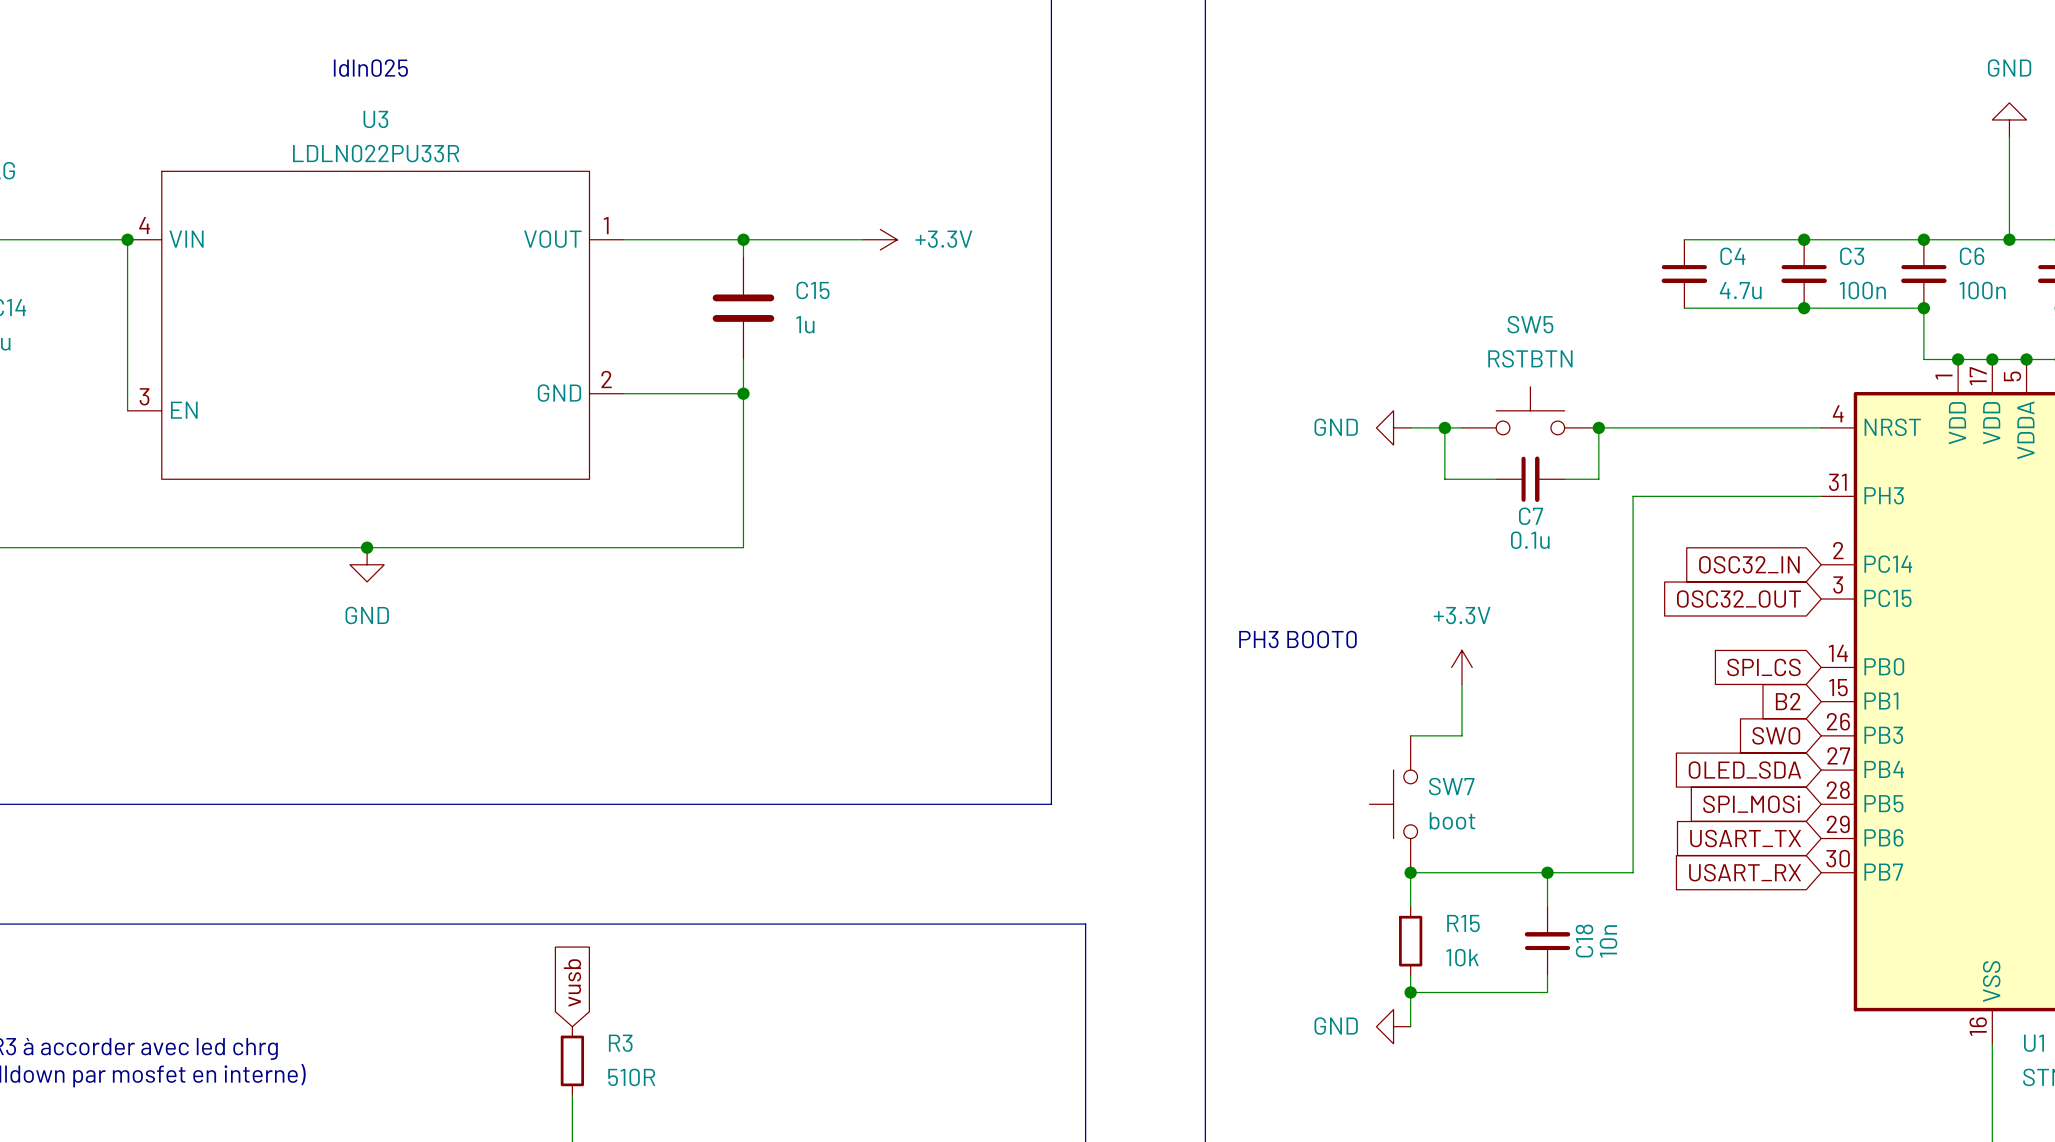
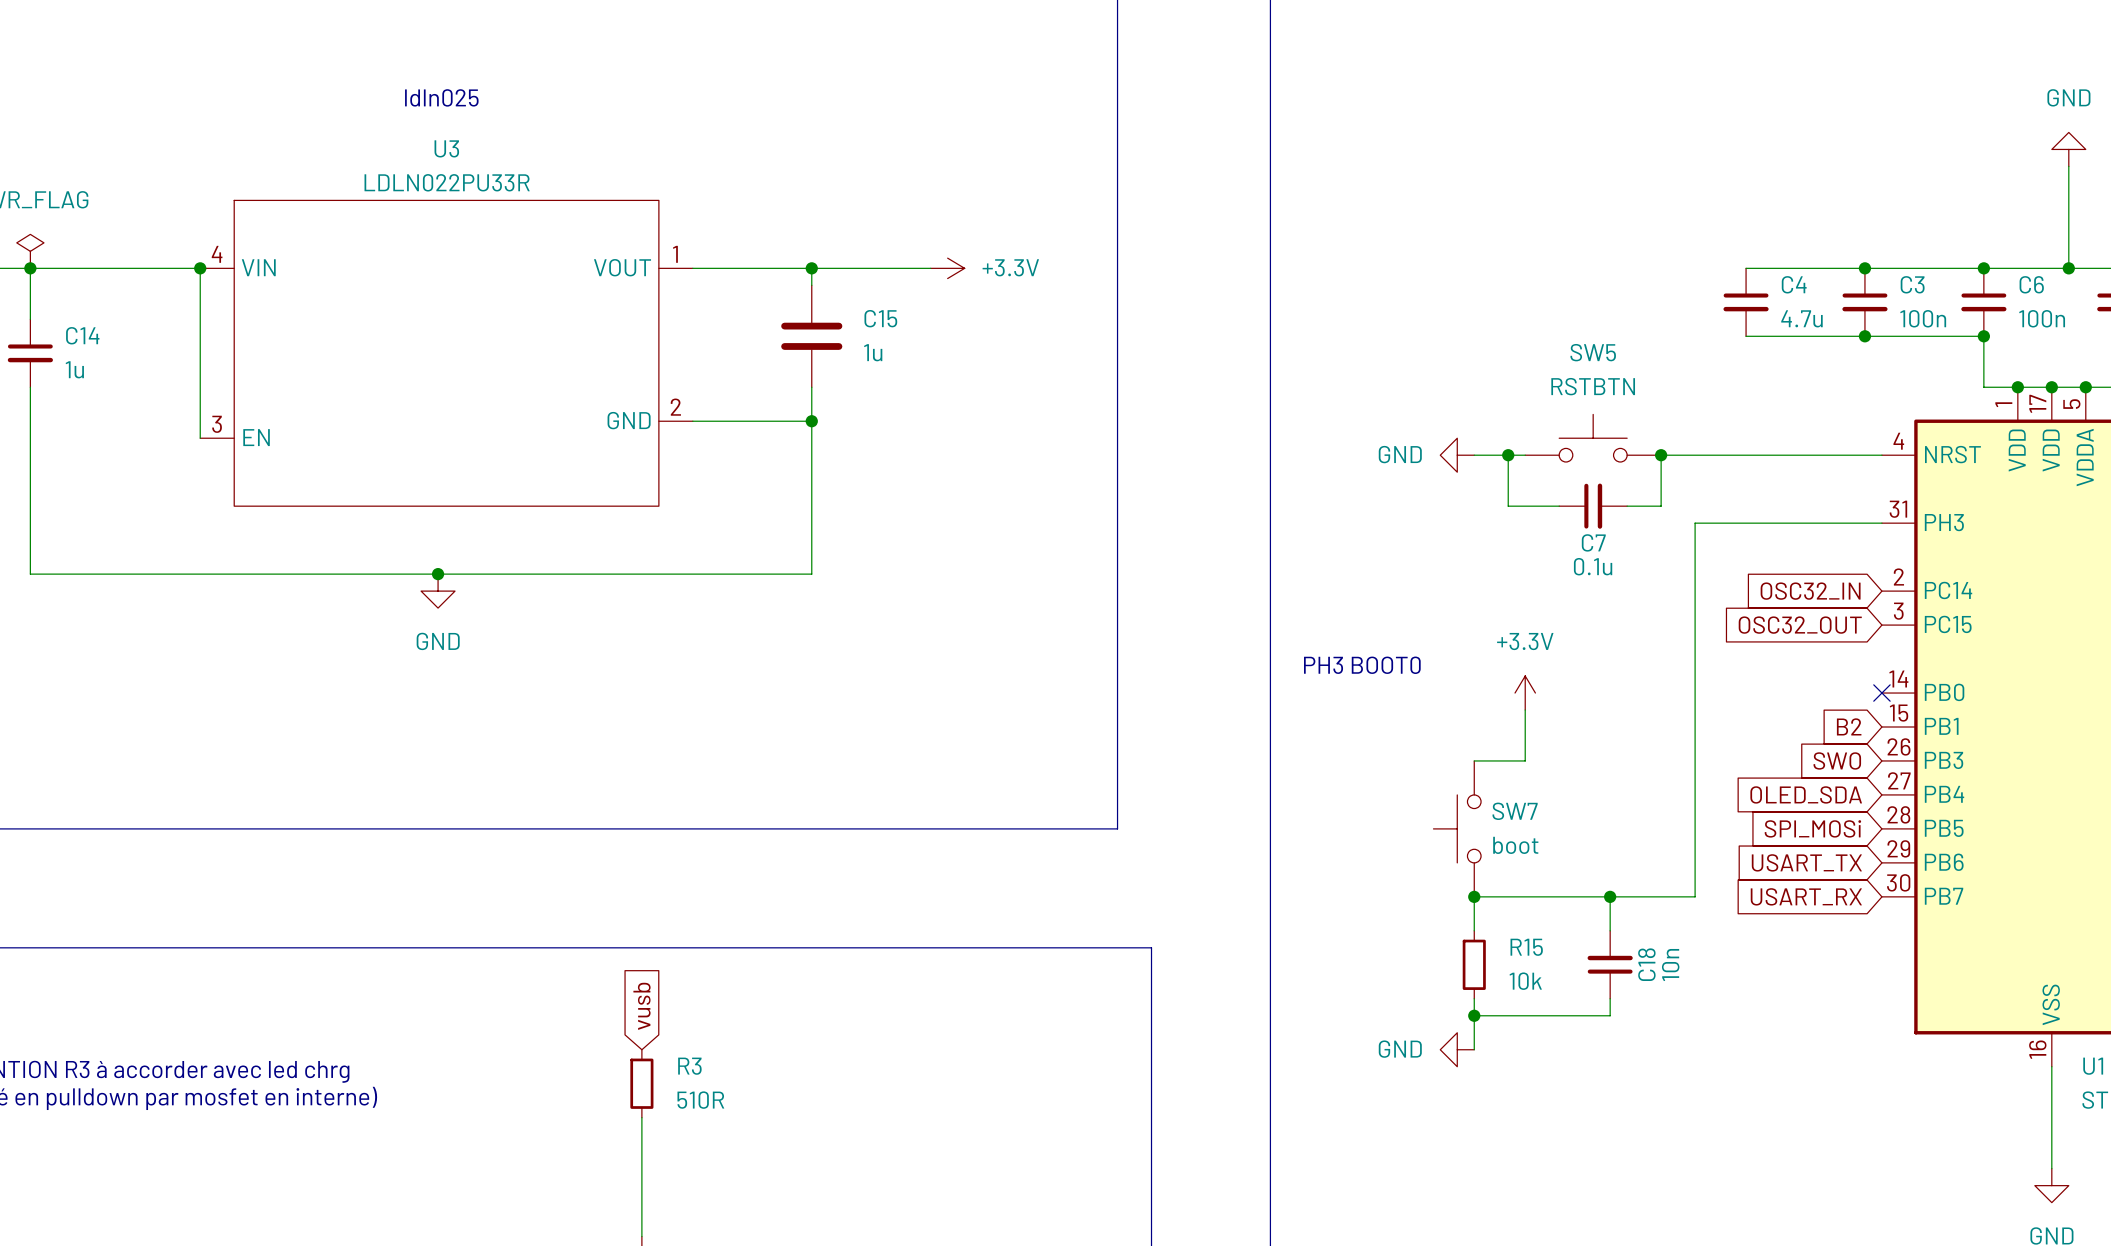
global label: SPI_CS (1763, 667) -> none
no-connect mark: none -> (1881, 693)

